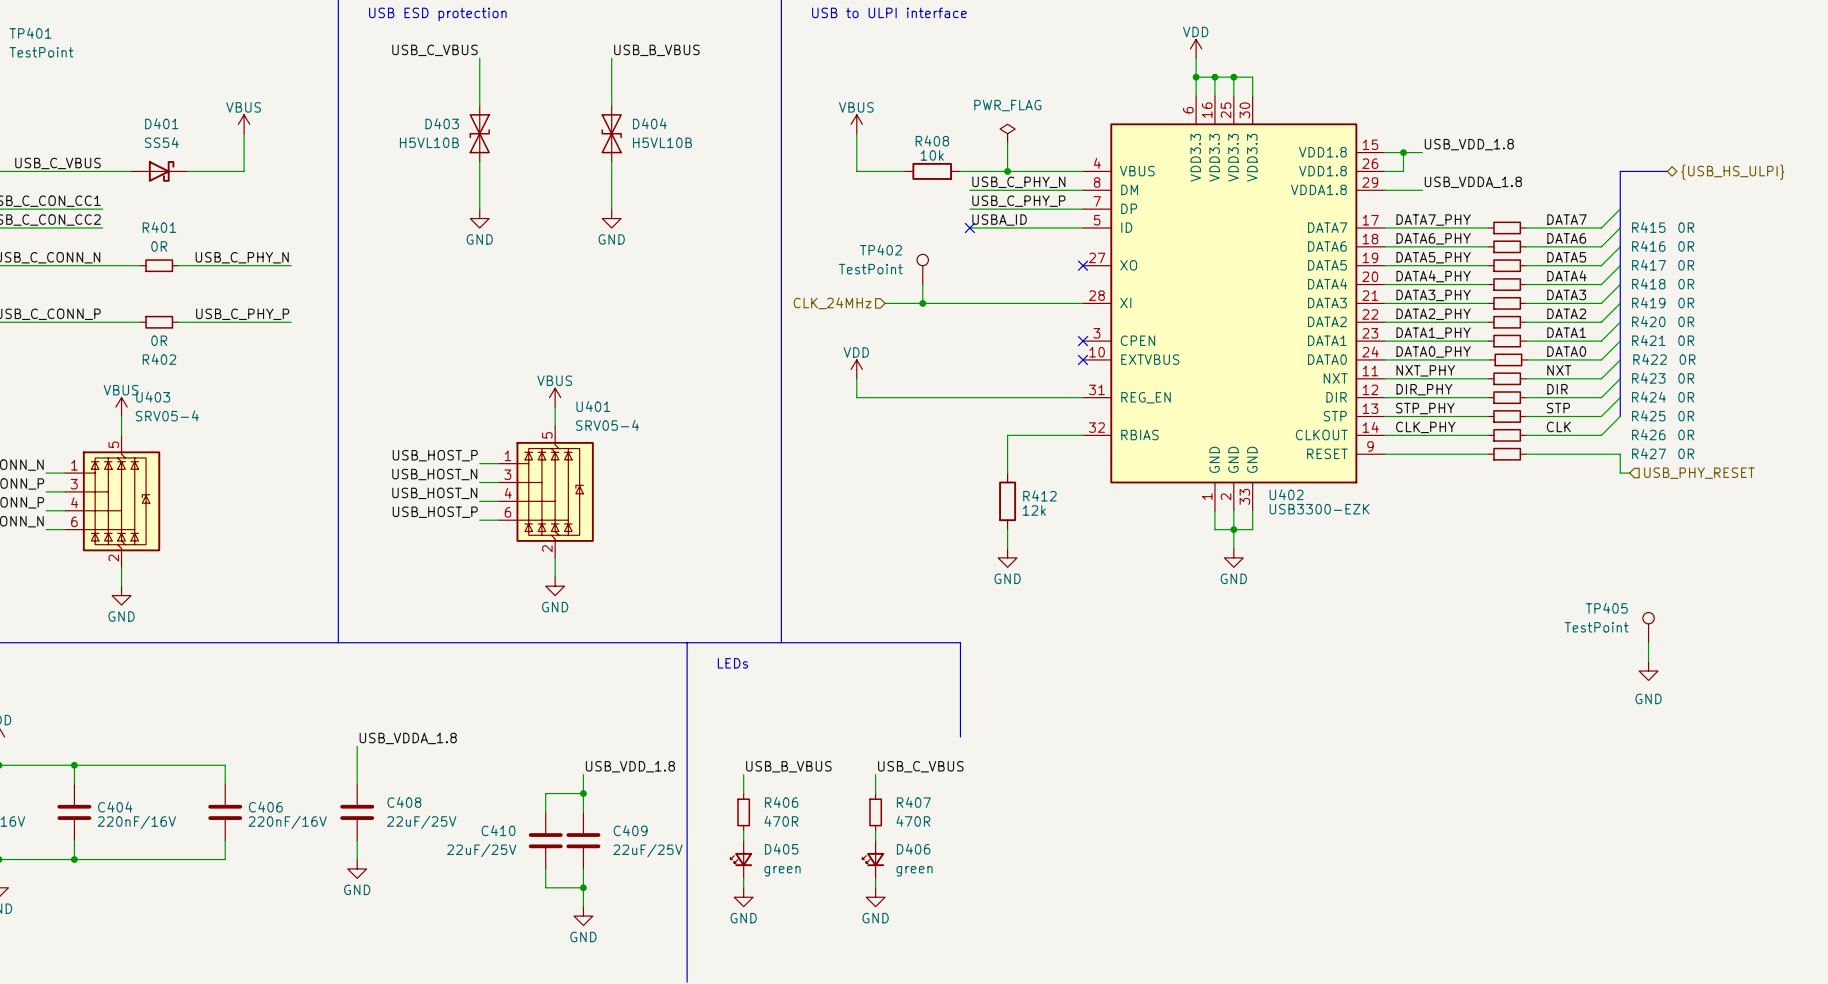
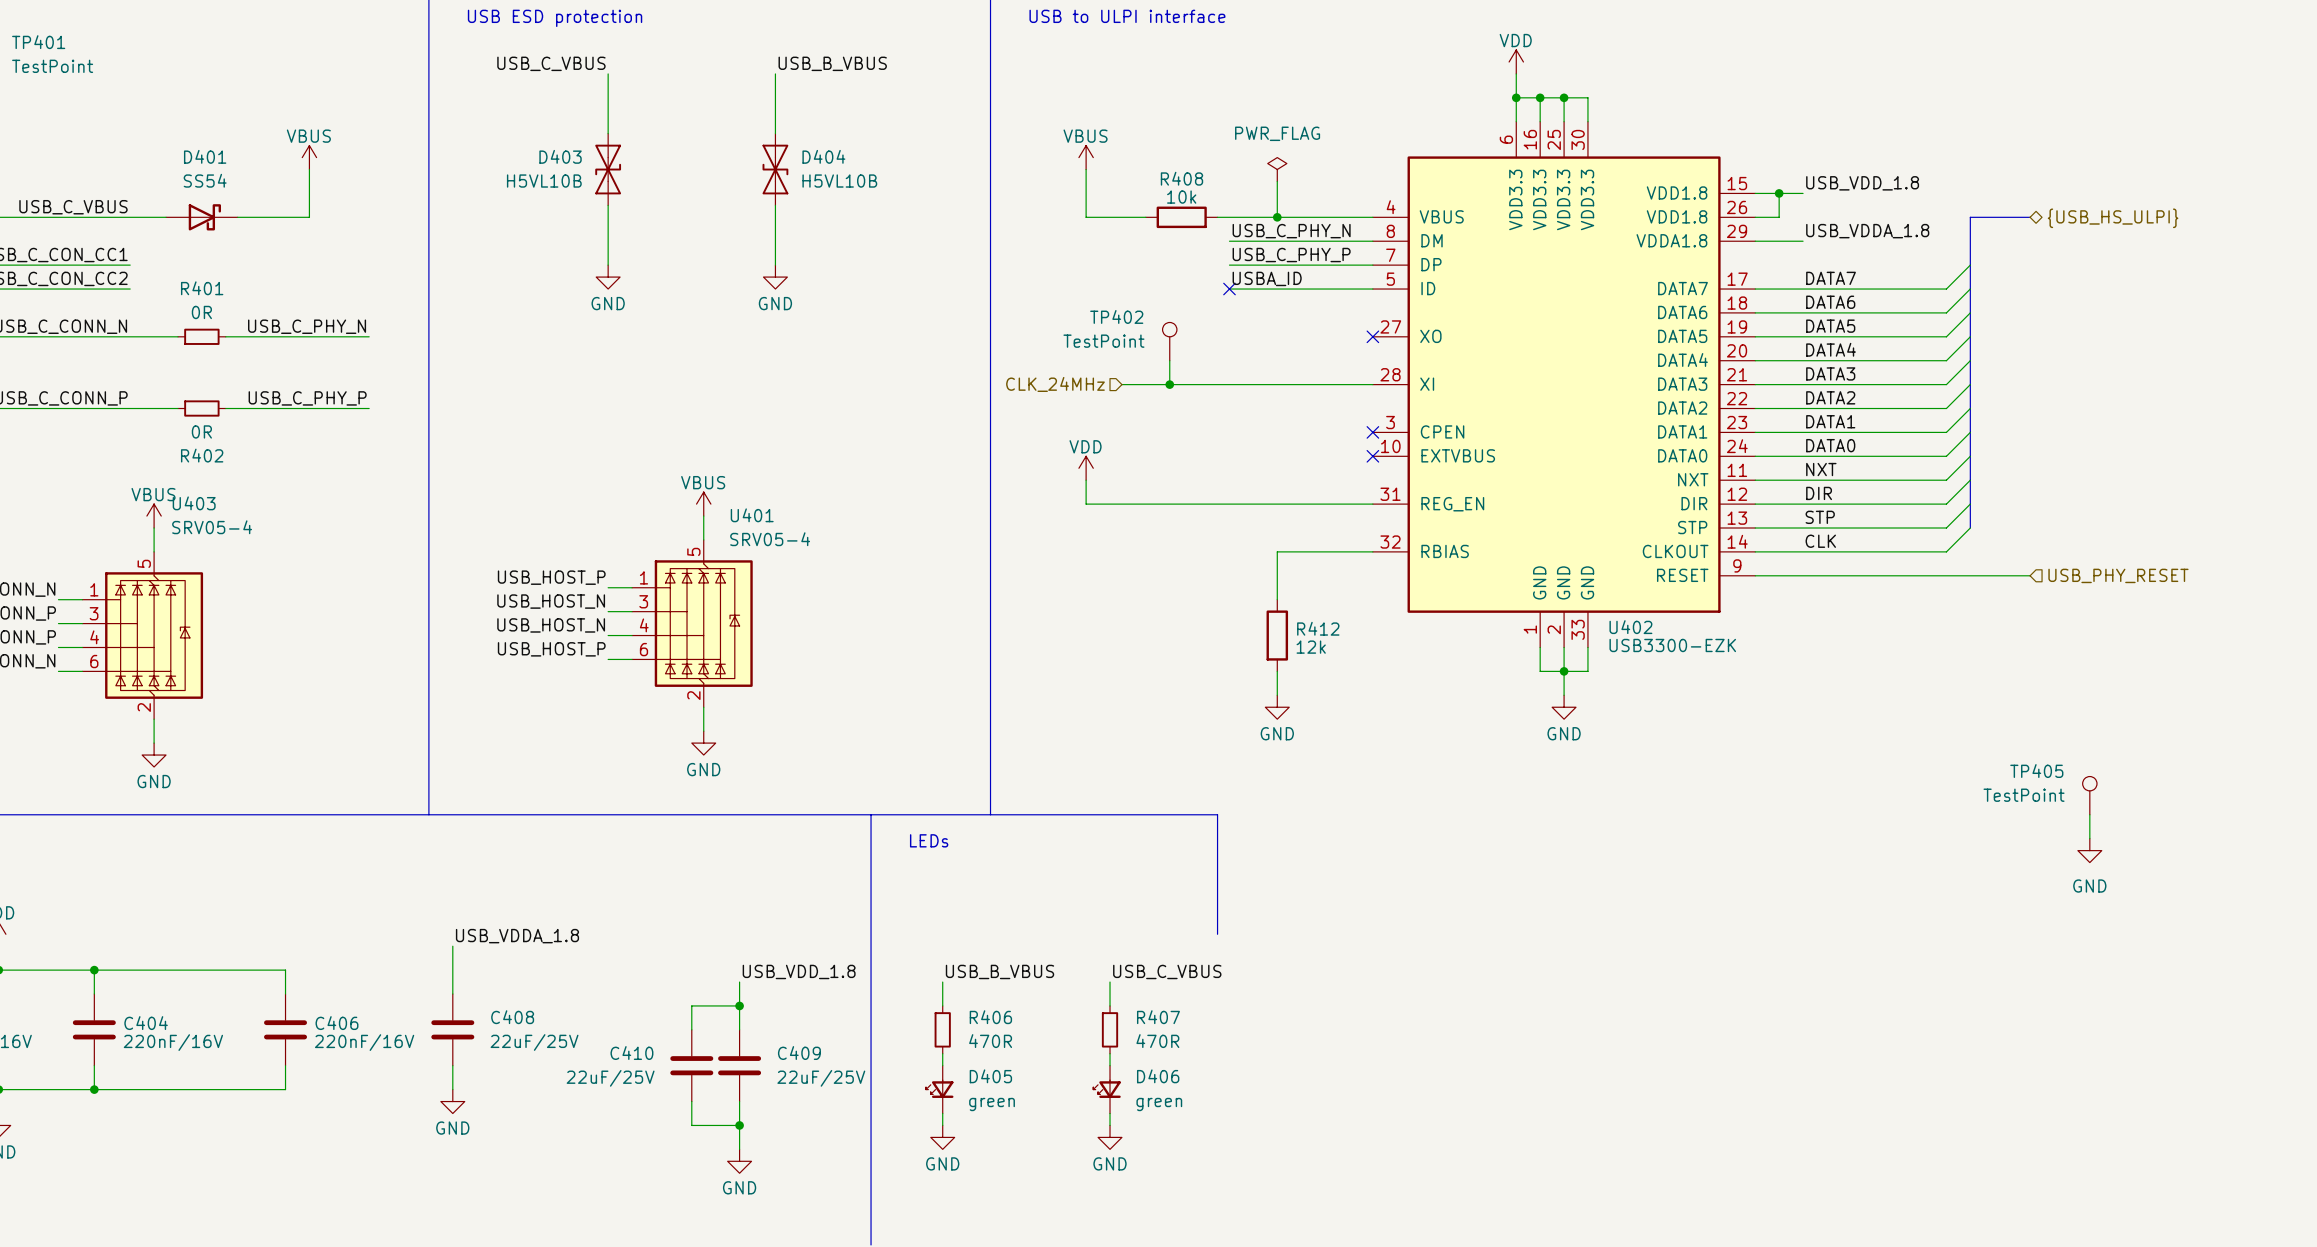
bus: (1667, 171) (1620, 171) (1620, 416) -> (2030, 217) (1970, 217) (1970, 528)
hierarchical label position: {USB_HS_ULPI} (1732, 172) -> {USB_HS_ULPI} (2113, 218)
wire: (1620, 209) (1601, 227) (1535, 227) -> (1970, 265) (1946, 289)
label position: DATA7 (1566, 219) -> DATA7 (1831, 278)
label: DATA7_PHY (1433, 220) -> none
wire: none -> (1886, 289) (1934, 289)
R415: 0R (1507, 227) -> none
wire: (1620, 227) (1601, 246) (1535, 246) -> (1970, 289) (1946, 312)
label: DATA6_PHY (1433, 238) -> none
label position: DATA6 (1566, 238) -> DATA6 (1830, 302)
wire: none -> (1886, 312) (1934, 312)
R416: 0R (1507, 246) -> none
wire: (1620, 246) (1601, 265) (1535, 265) -> (1970, 312) (1946, 336)
label: DATA5_PHY (1433, 257) -> none
label position: DATA5 (1566, 257) -> DATA5 (1830, 326)
wire: none -> (1886, 336) (1934, 336)
R417: 0R (1507, 265) -> none
wire: (1620, 265) (1601, 284) (1535, 284) -> (1970, 336) (1946, 360)
label position: DATA4 (1566, 275) -> DATA4 (1831, 349)
label: DATA4_PHY (1433, 276) -> none
wire: none -> (1886, 360) (1934, 360)
R418: 0R (1507, 284) -> none
wire: (1620, 284) (1601, 303) (1535, 303) -> (1970, 360) (1946, 384)
label position: DATA3 (1566, 294) -> DATA3 (1830, 373)
label: DATA3_PHY (1433, 295) -> none
wire: none -> (1886, 384) (1934, 384)
R419: 0R (1507, 303) -> none
wire: (1620, 303) (1601, 322) (1535, 322) -> (1970, 384) (1946, 408)
label position: DATA2 (1566, 313) -> DATA2 (1830, 397)
label: DATA2_PHY (1433, 314) -> none
wire: none -> (1886, 408) (1934, 408)
R420: 0R (1507, 322) -> none
wire: (1620, 322) (1601, 341) (1535, 341) -> (1970, 408) (1946, 432)
label position: DATA1 (1566, 332) -> DATA1 (1830, 421)
label: DATA1_PHY (1433, 333) -> none
wire: none -> (1886, 432) (1934, 432)
R421: 0R (1507, 341) -> none
wire: (1620, 341) (1601, 359) (1535, 359) -> (1970, 432) (1946, 456)
label: DATA0_PHY (1433, 351) -> none
label position: DATA0 (1566, 351) -> DATA0 (1830, 445)
wire: none -> (1888, 456) (1936, 456)
R422: 0R (1508, 359) -> none
wire: (1620, 359) (1601, 378) (1535, 378) -> (1970, 456) (1946, 480)
label: NXT_PHY (1425, 370) -> none
label position: NXT (1559, 370) -> NXT (1821, 469)
wire: none -> (1886, 480) (1934, 480)
R423: 0R (1507, 378) -> none
wire: (1620, 378) (1601, 397) (1535, 397) -> (1970, 480) (1946, 504)
label: DIR_PHY (1424, 389) -> none
label position: DIR (1557, 389) -> DIR (1819, 493)
wire: none -> (1886, 504) (1934, 504)
R424: 0R (1507, 397) -> none
wire: (1620, 397) (1601, 416) (1535, 416) -> (1970, 504) (1946, 528)
label: STP_PHY (1425, 408) -> none
label position: STP (1558, 408) -> STP (1820, 517)
wire: none -> (1886, 528) (1934, 528)
R425: 0R (1507, 416) -> none
wire: (1620, 416) (1601, 435) (1535, 435) -> (1970, 528) (1946, 551)
label position: CLK (1558, 426) -> CLK (1820, 541)
label: CLK_PHY (1425, 427) -> none
wire: none -> (1886, 551) (1934, 551)
R426: 0R (1507, 435) -> none
wire: none -> (1886, 575) (1934, 575)
R427: 0R (1507, 454) -> none
wire: (1601, 454) (1620, 454) (1620, 473) (1629, 473) -> none
hierarchical label position: USB_PHY_RESET (1699, 473) -> USB_PHY_RESET (2118, 575)

